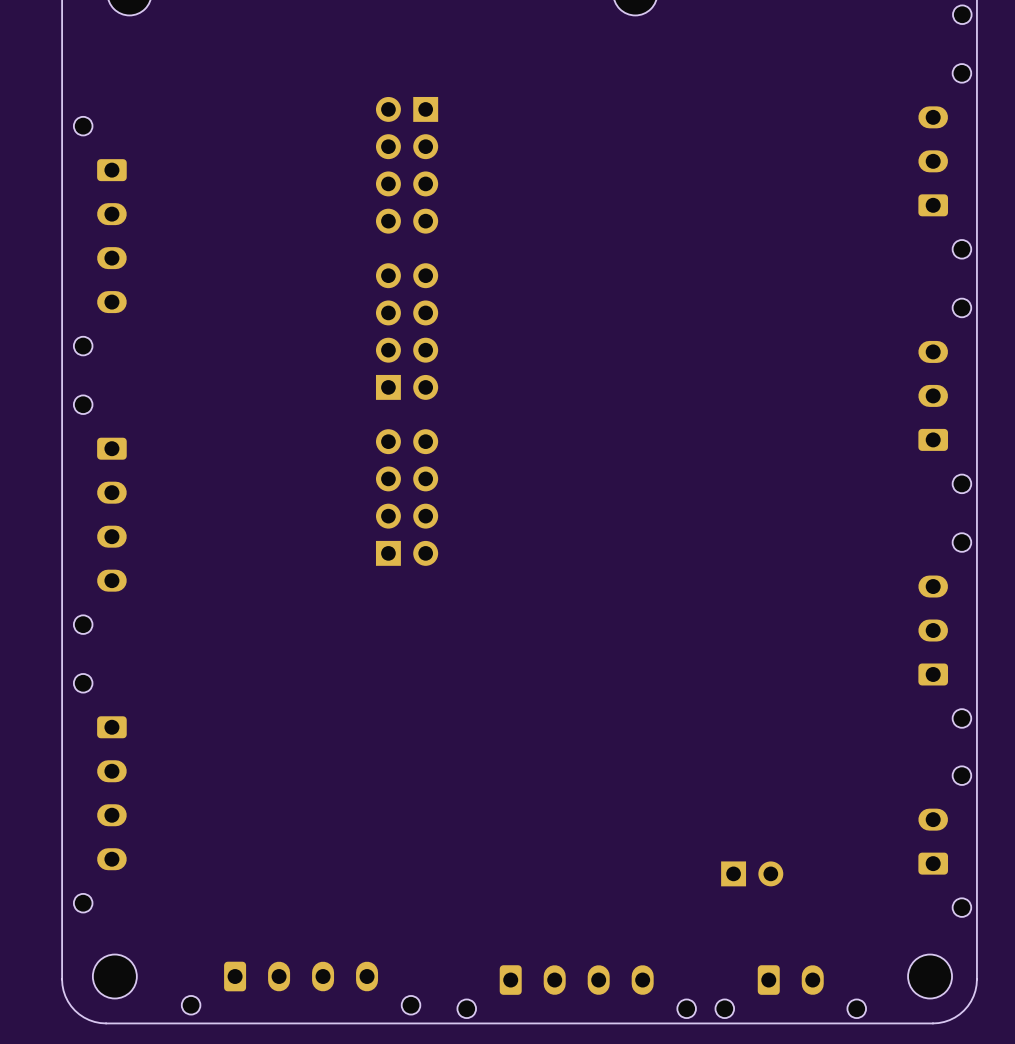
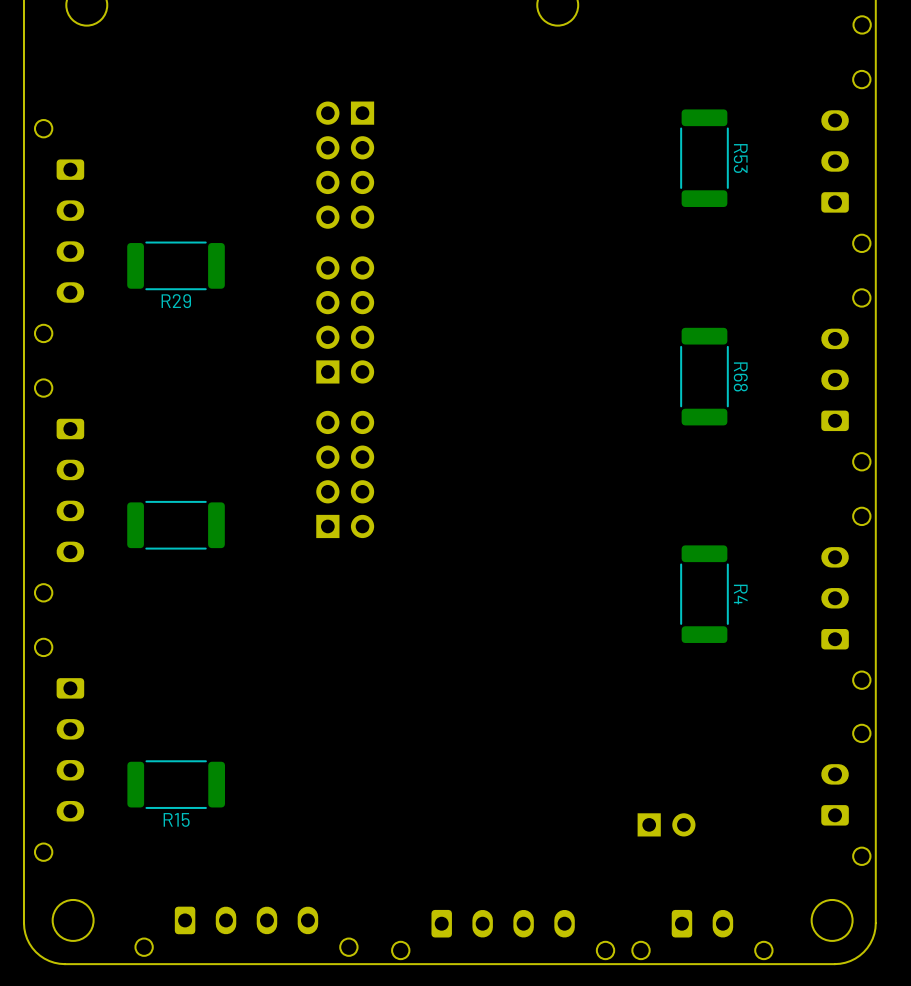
R53: none -> (704, 158)
R29: none -> (176, 265)
R68: none -> (704, 376)
part: none -> (176, 525)
R4: none -> (704, 594)
R15: none -> (176, 784)

